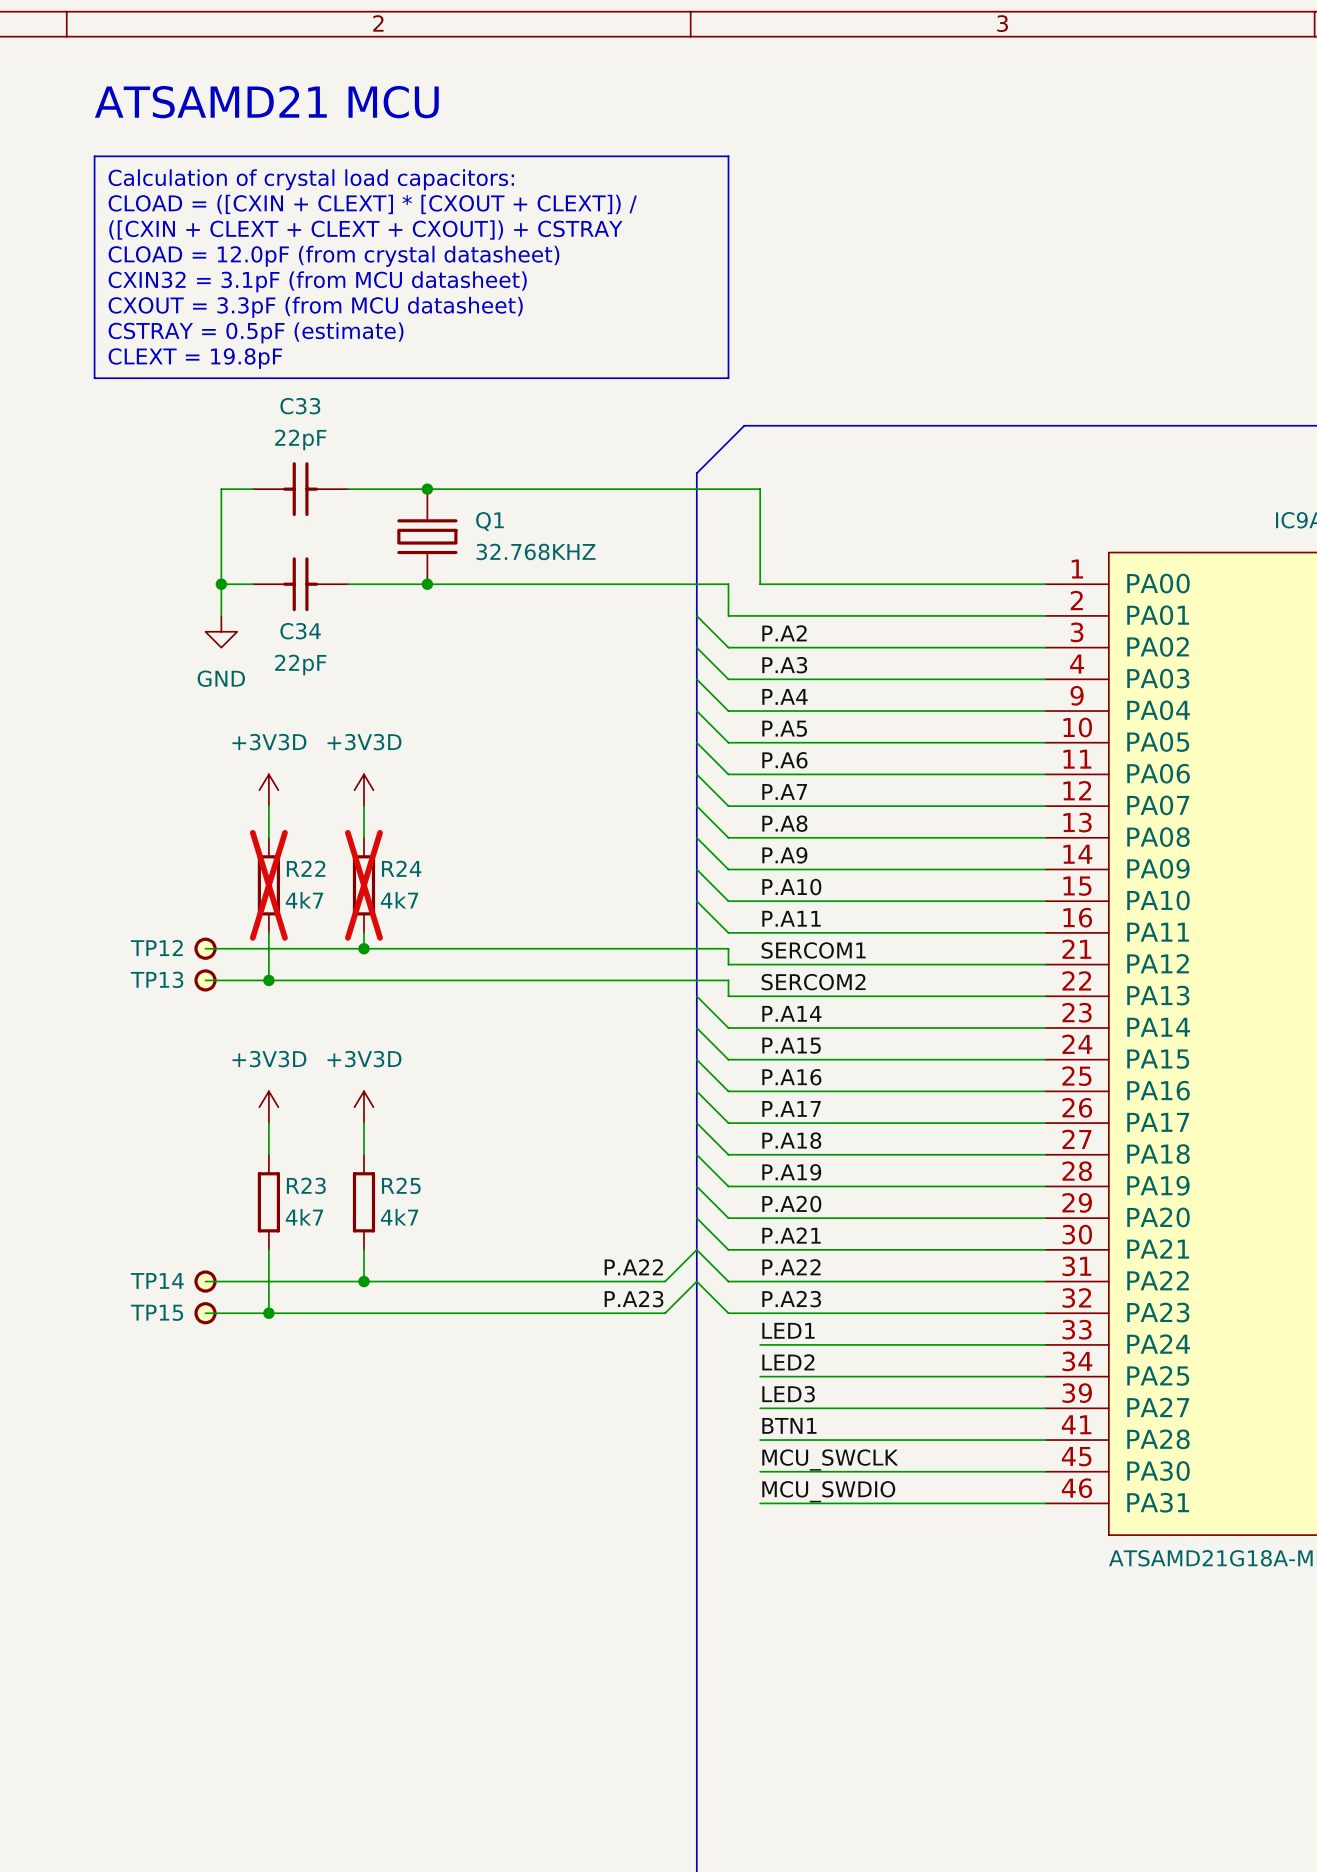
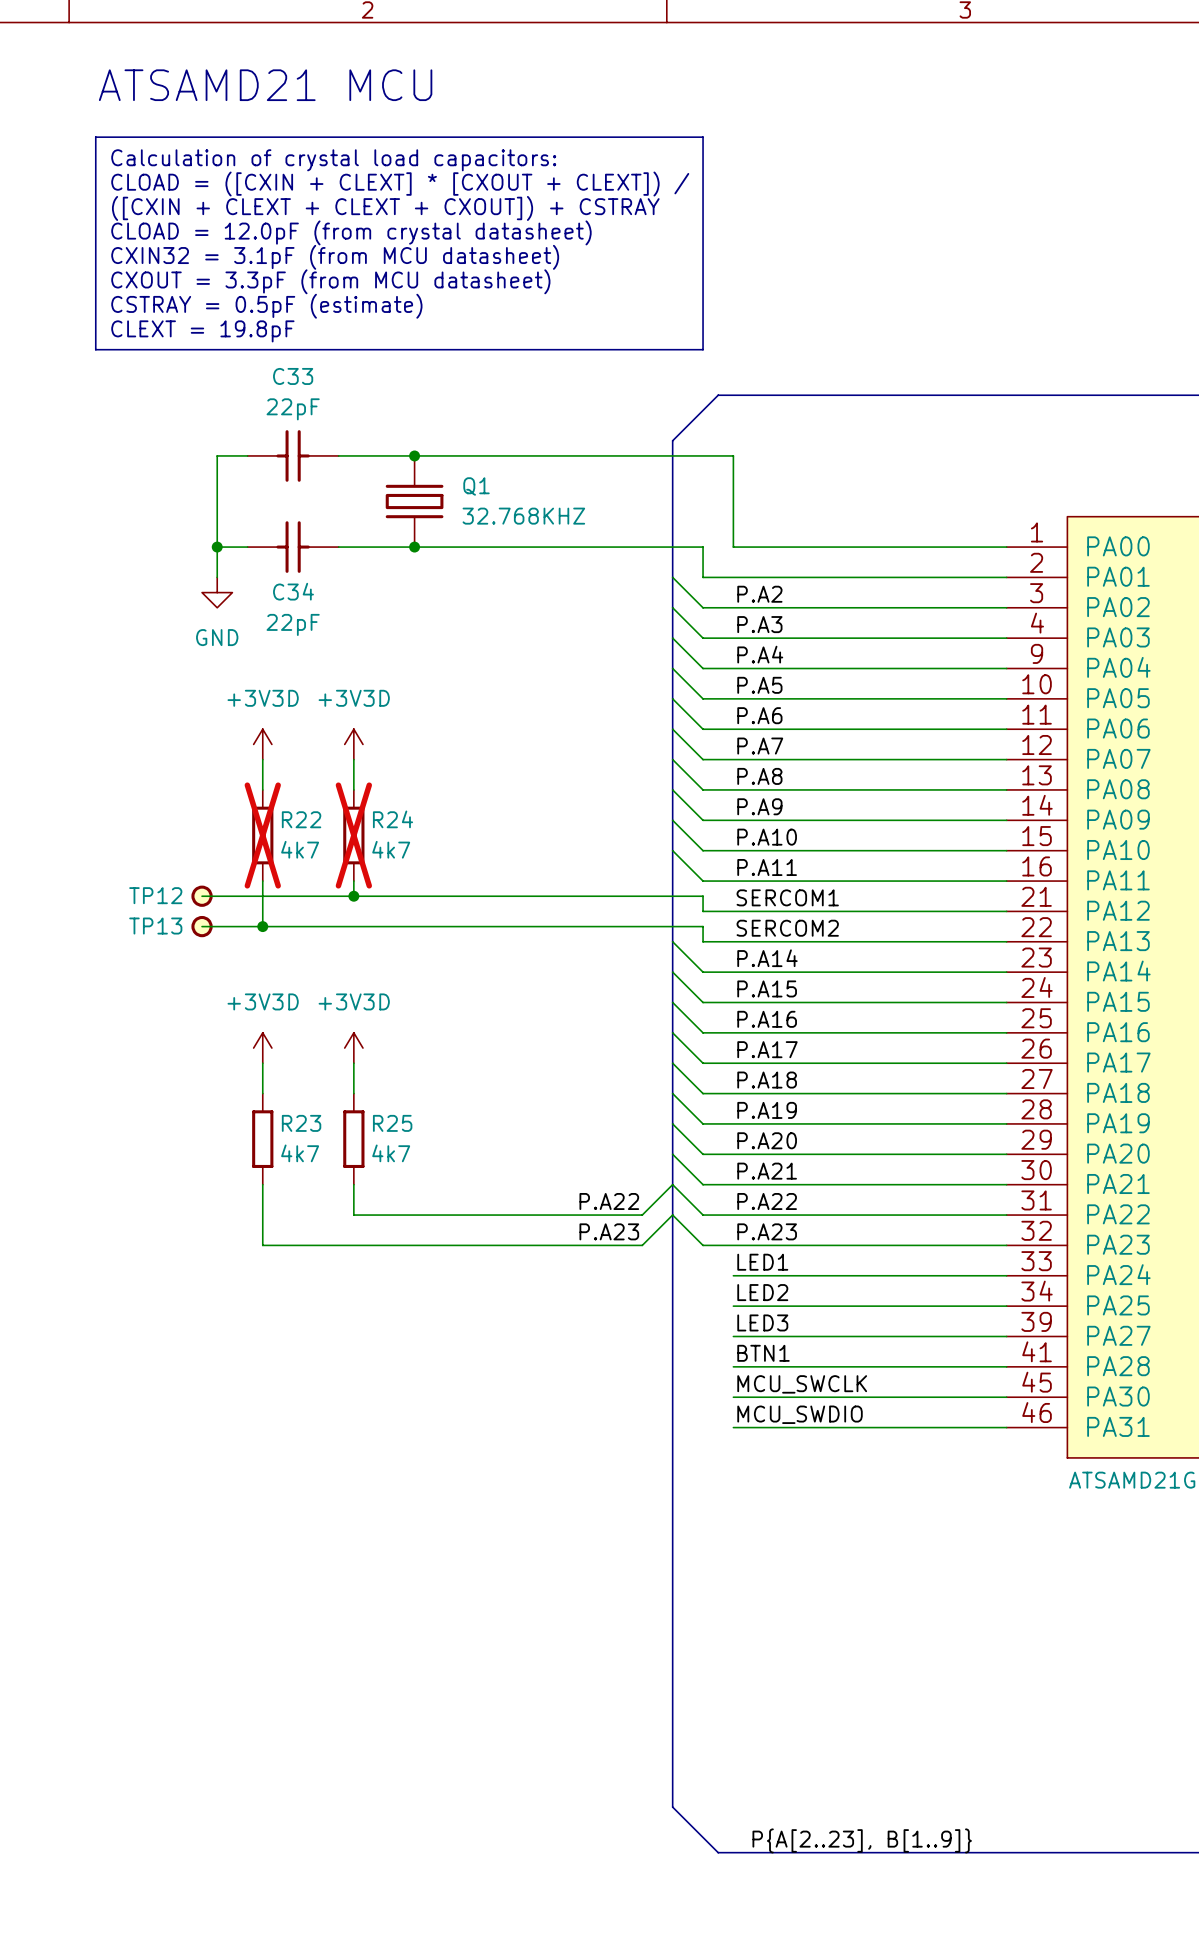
wire: (205, 1281) (363, 1281) -> none
TP14: (205, 1281) -> none
junction: (363, 1281) -> none
wire: (205, 1313) (268, 1313) -> none
TP15: (205, 1313) -> none
junction: (268, 1313) -> none

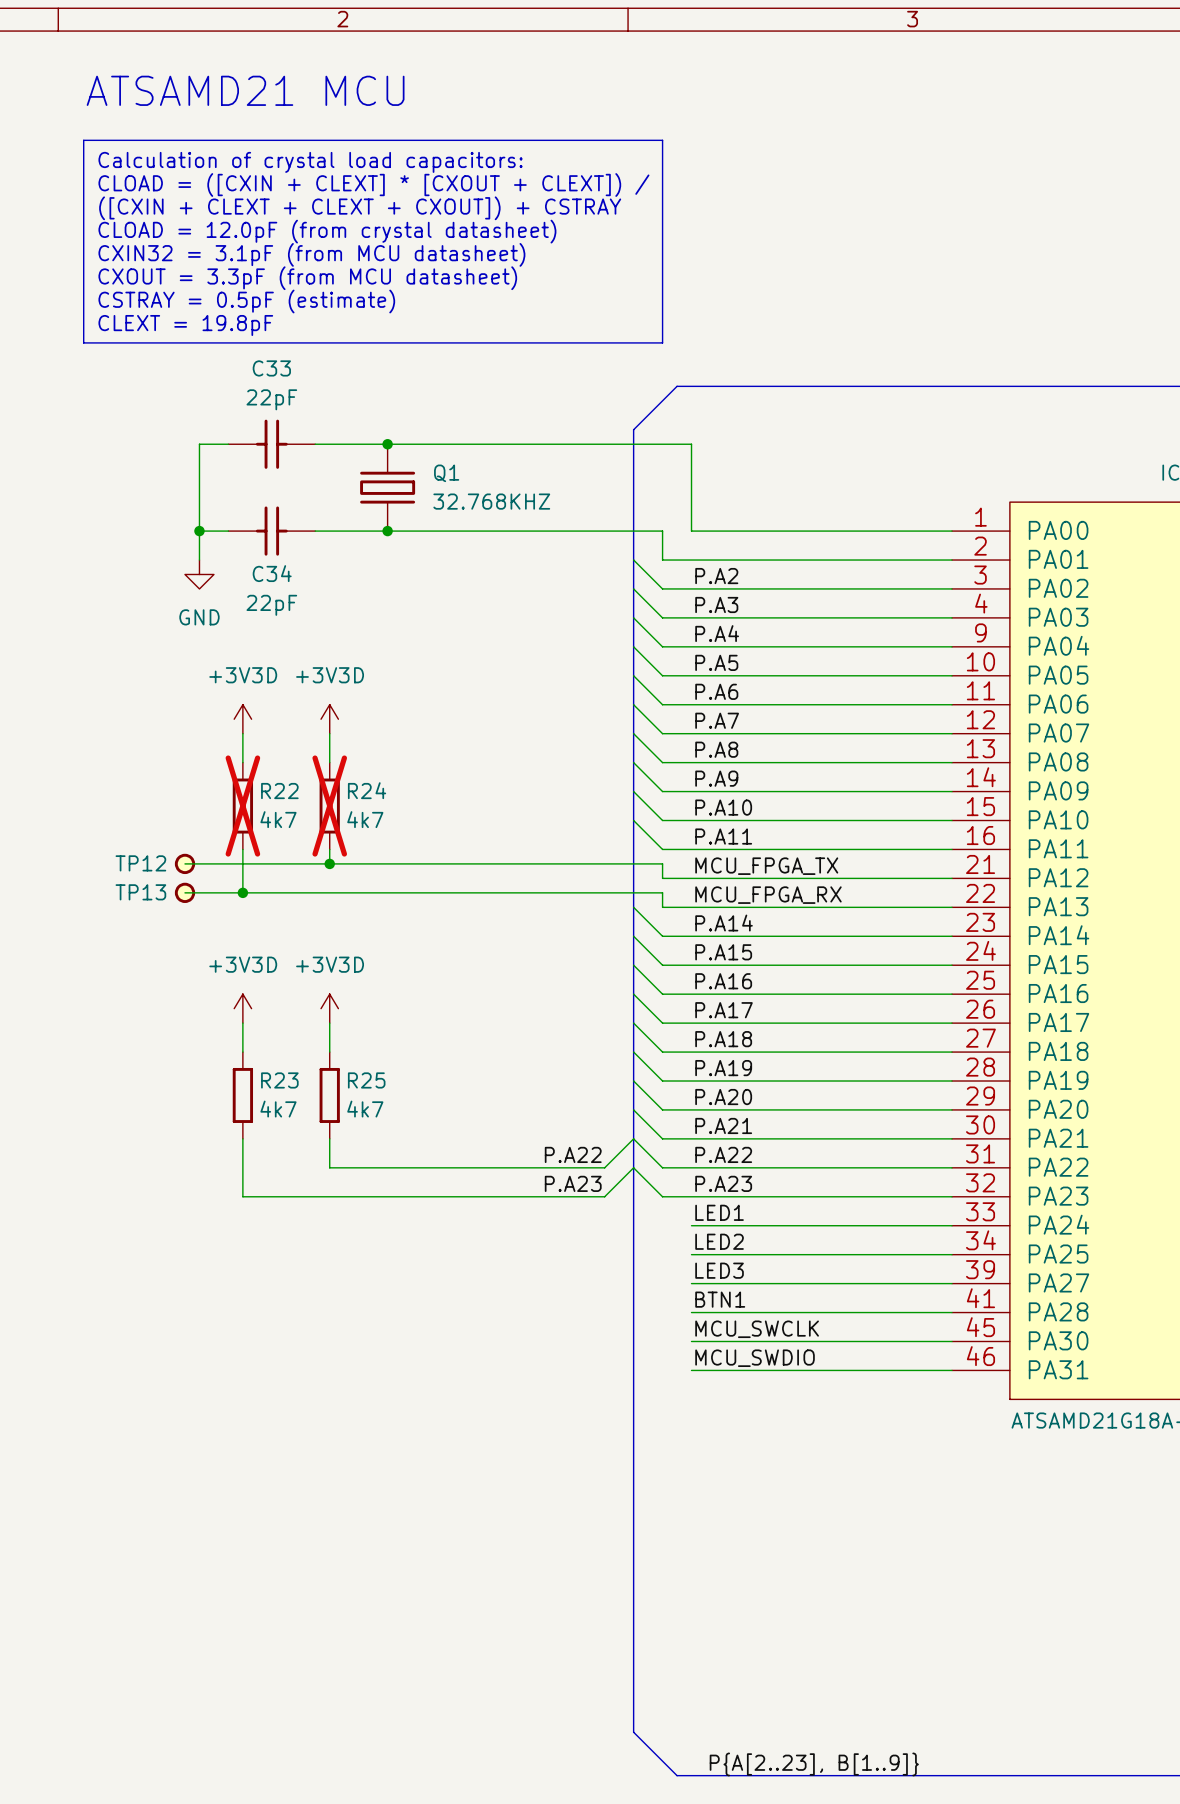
label: SERCOM1 (787, 897) -> MCU_FPGA_TX (766, 866)
label: SERCOM2 (787, 928) -> MCU_FPGA_RX (768, 895)

